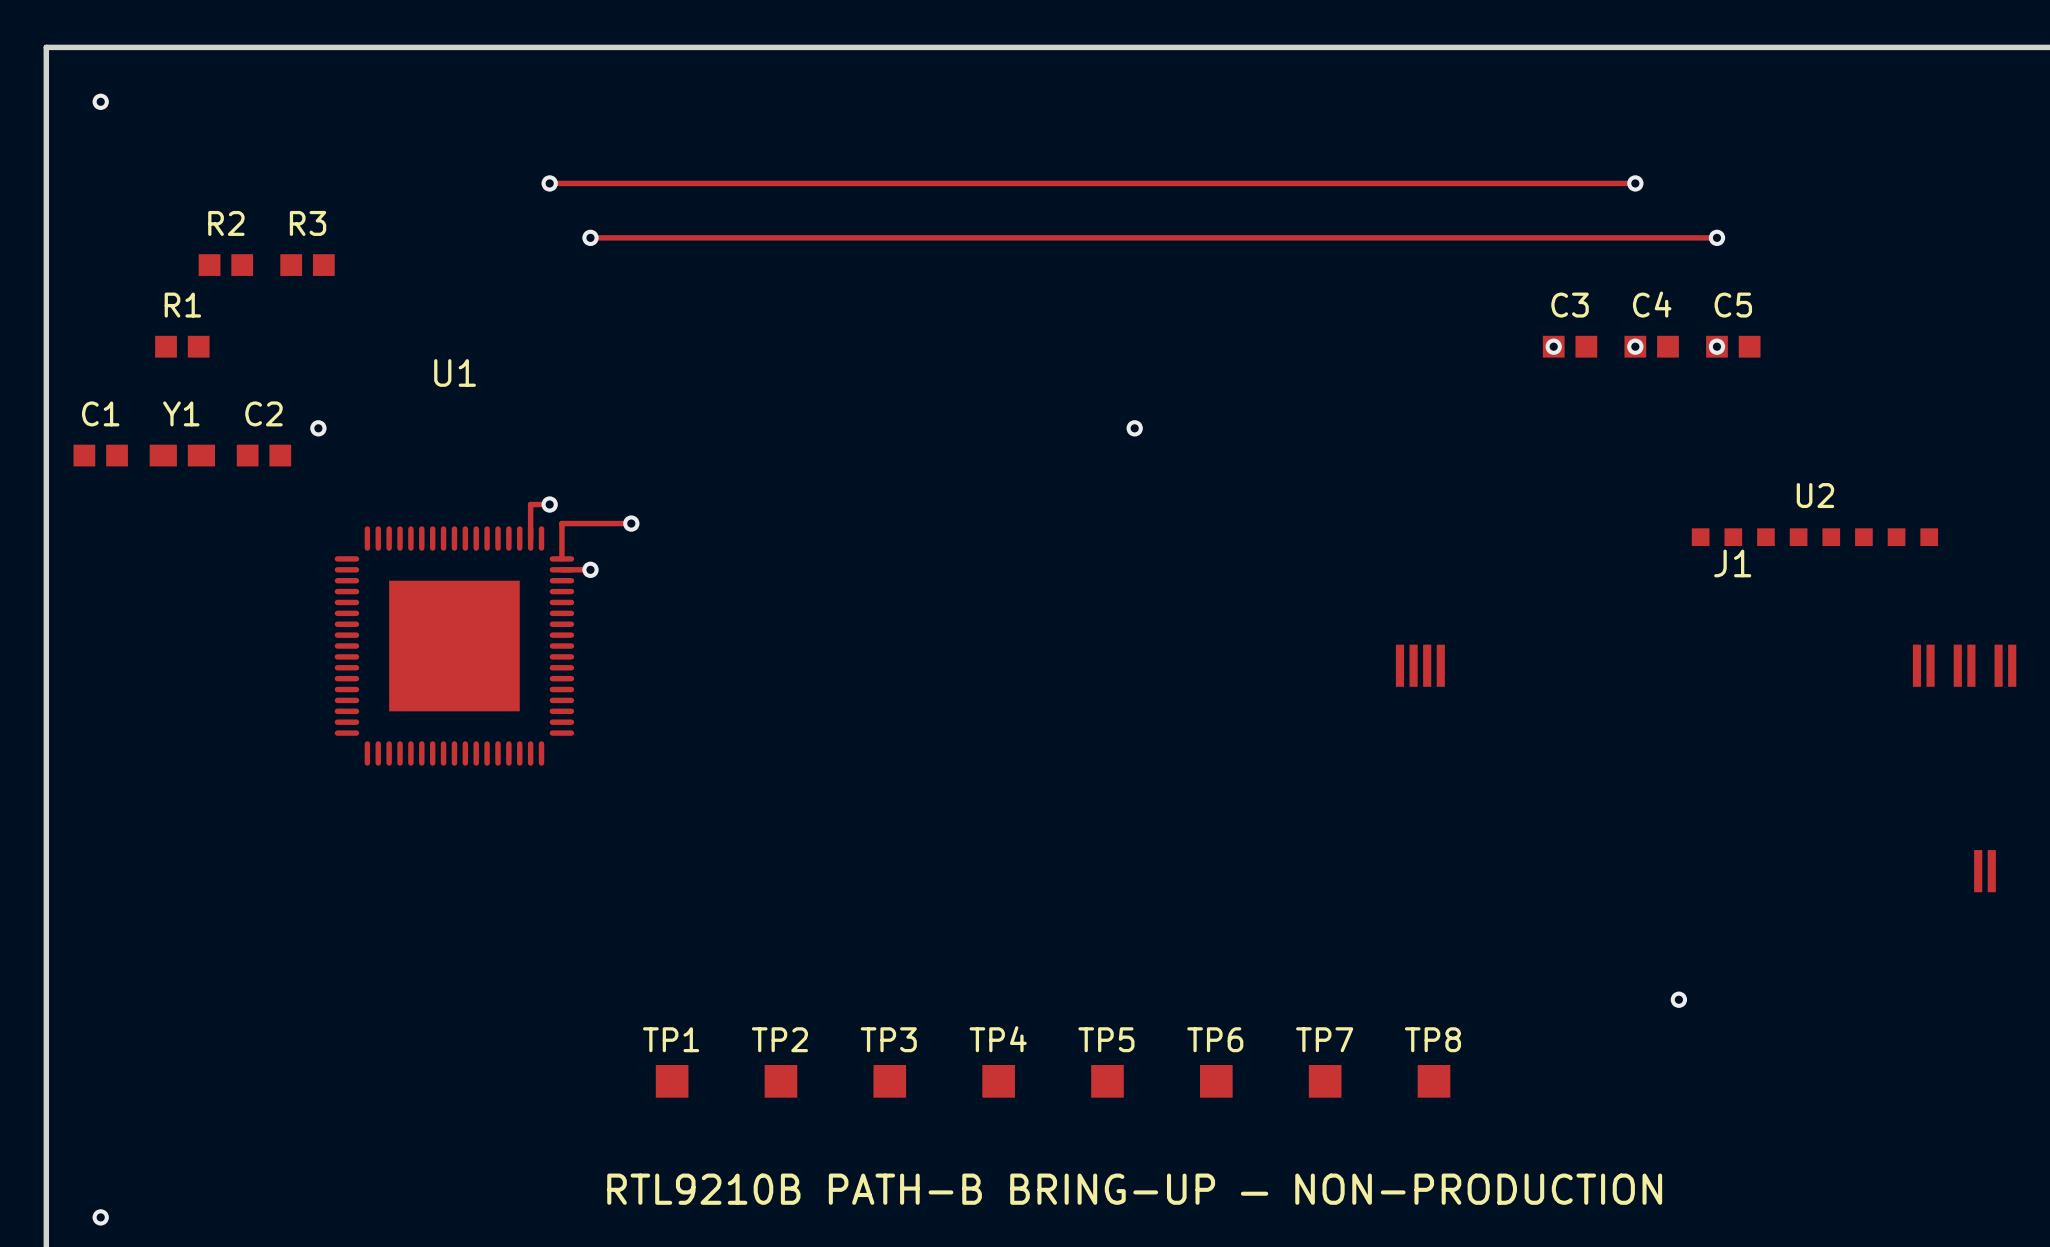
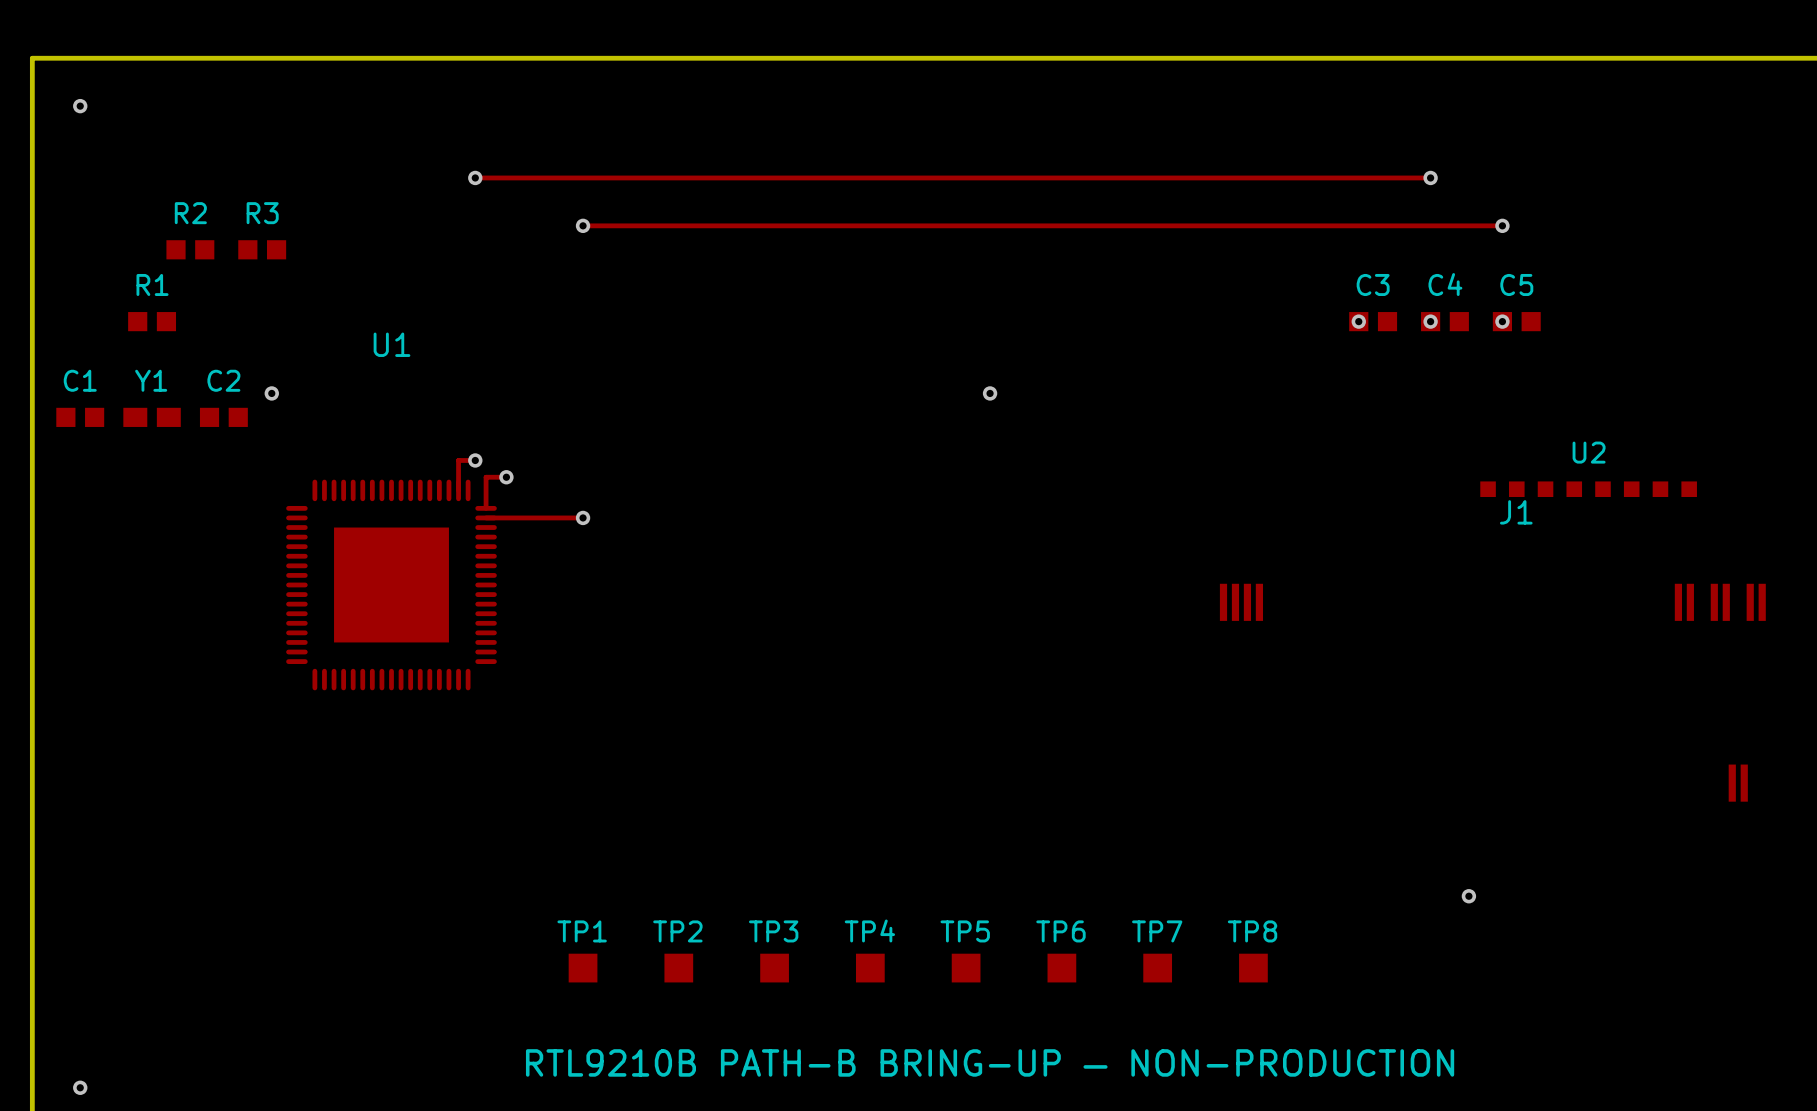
track: (590, 237) (672, 237) -> (511, 517) (583, 517)
via position: (590, 237) -> (583, 225)
track: (585, 523) (631, 523) -> none
via: none -> (506, 477)
via: (631, 523) -> none
via: (590, 569) -> none
via: none -> (583, 517)

